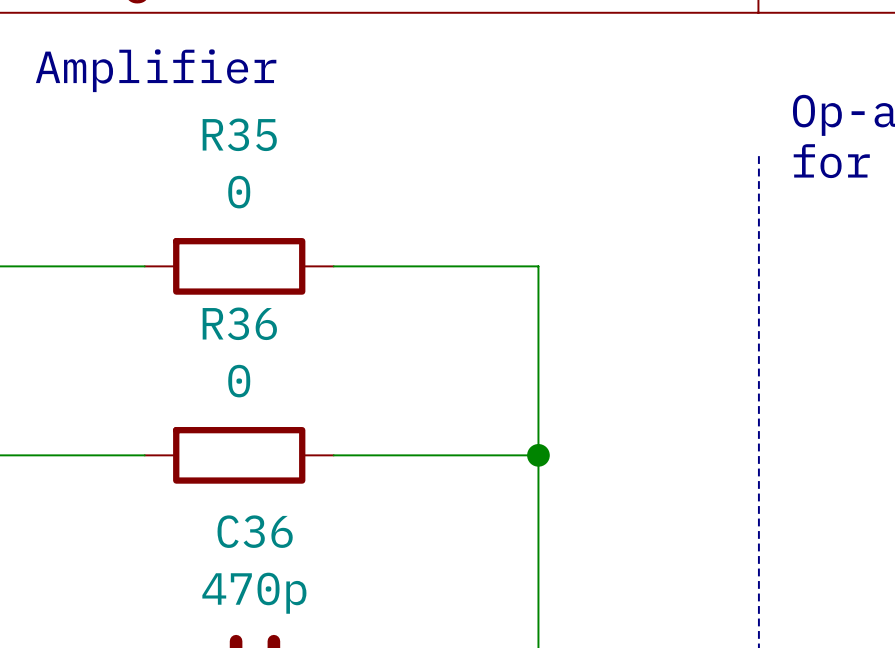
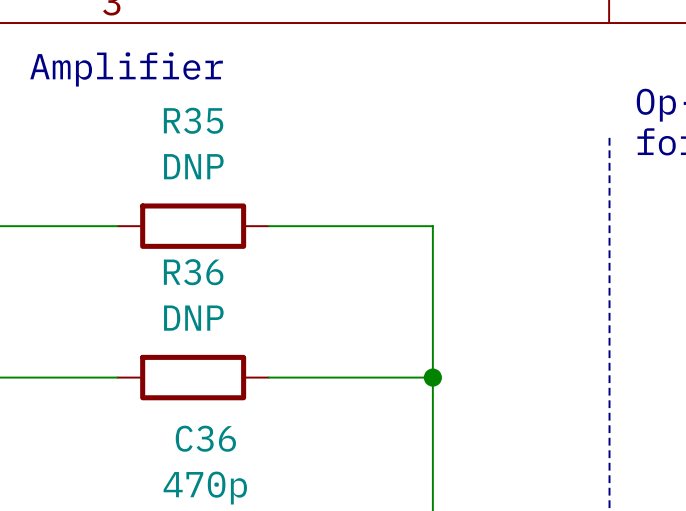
R35 value: 0 (239, 192) -> DNP (193, 166)
R36 value: 0 (239, 381) -> DNP (193, 318)

